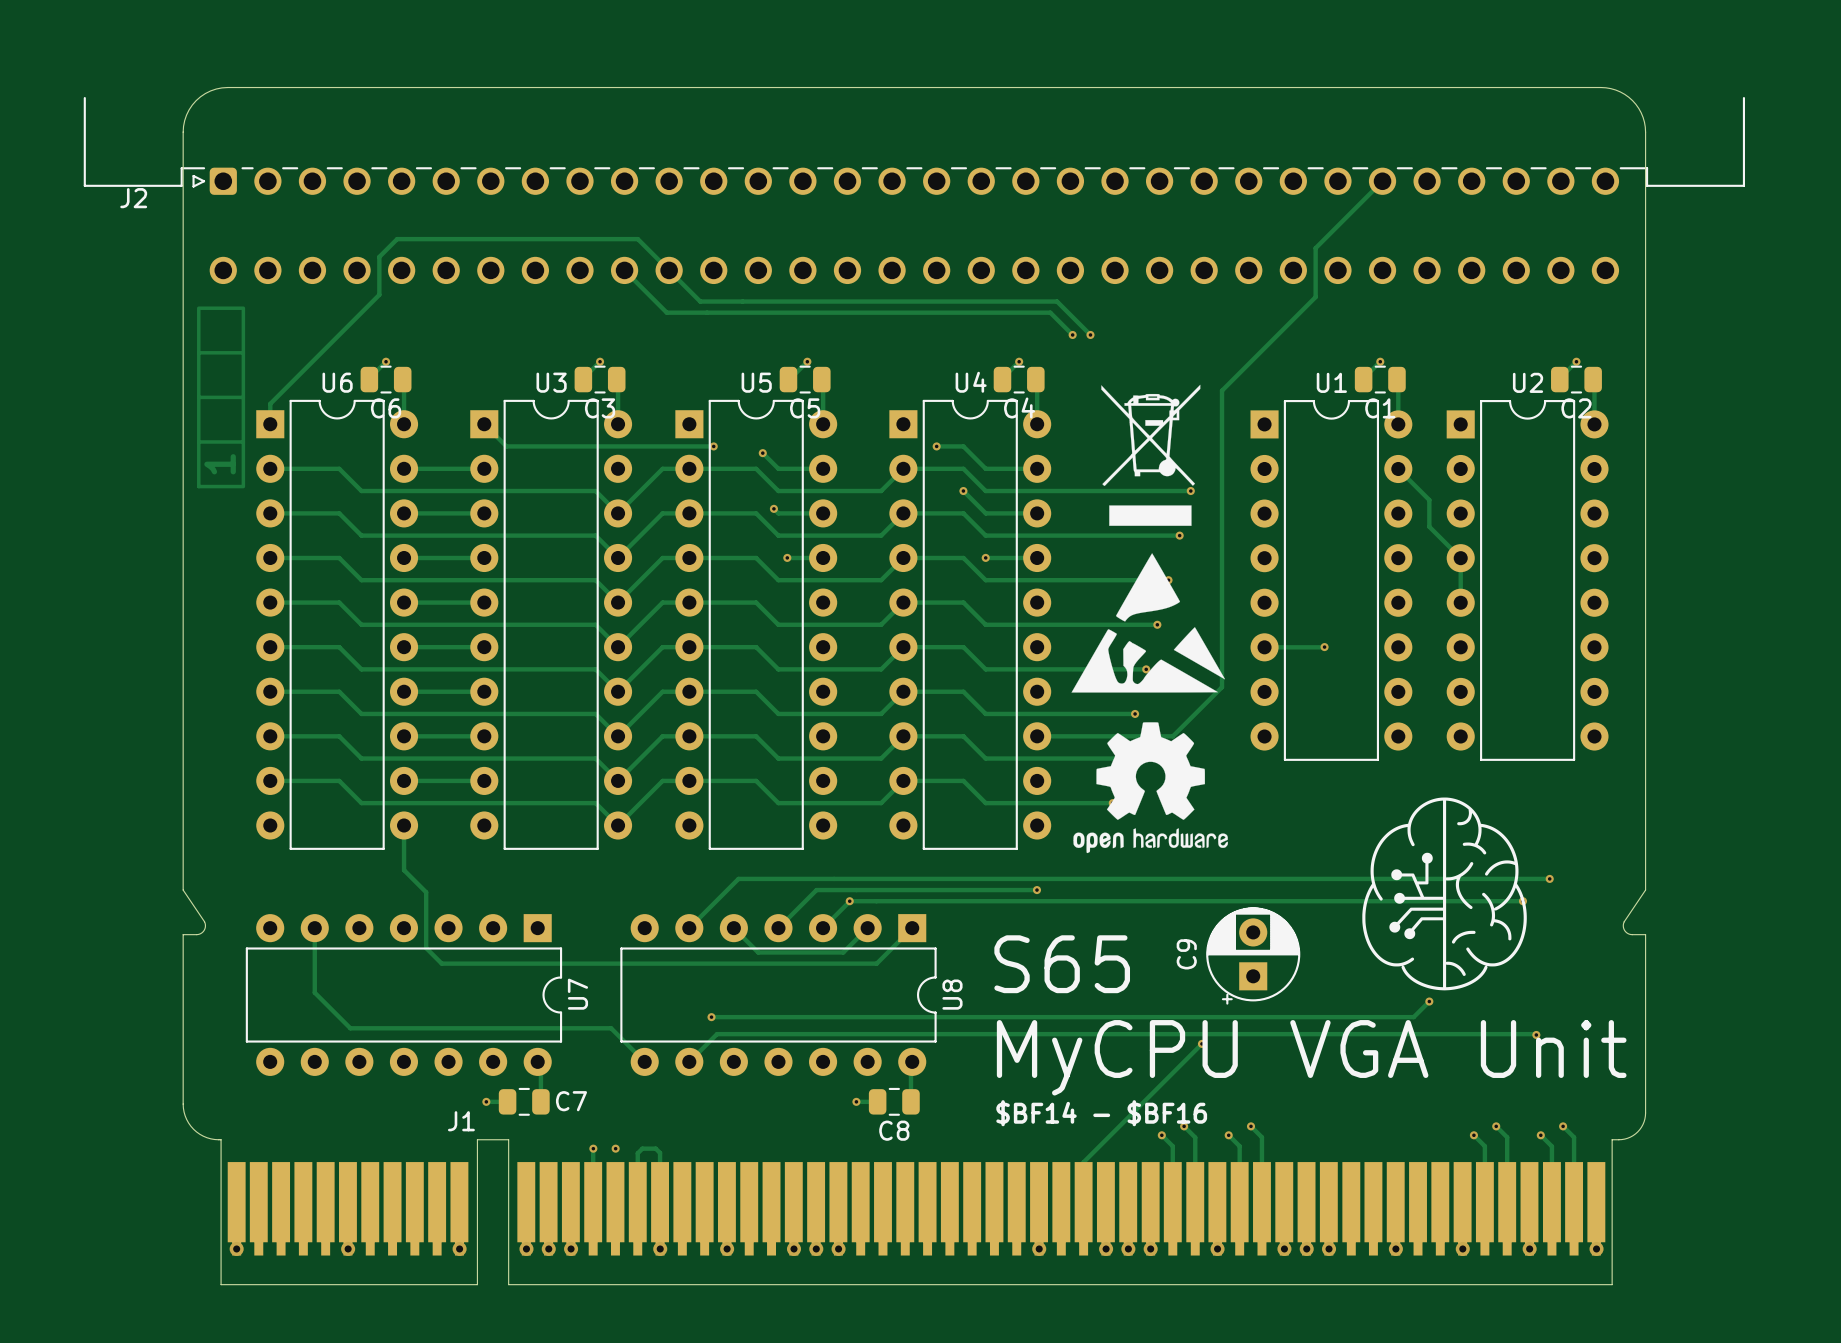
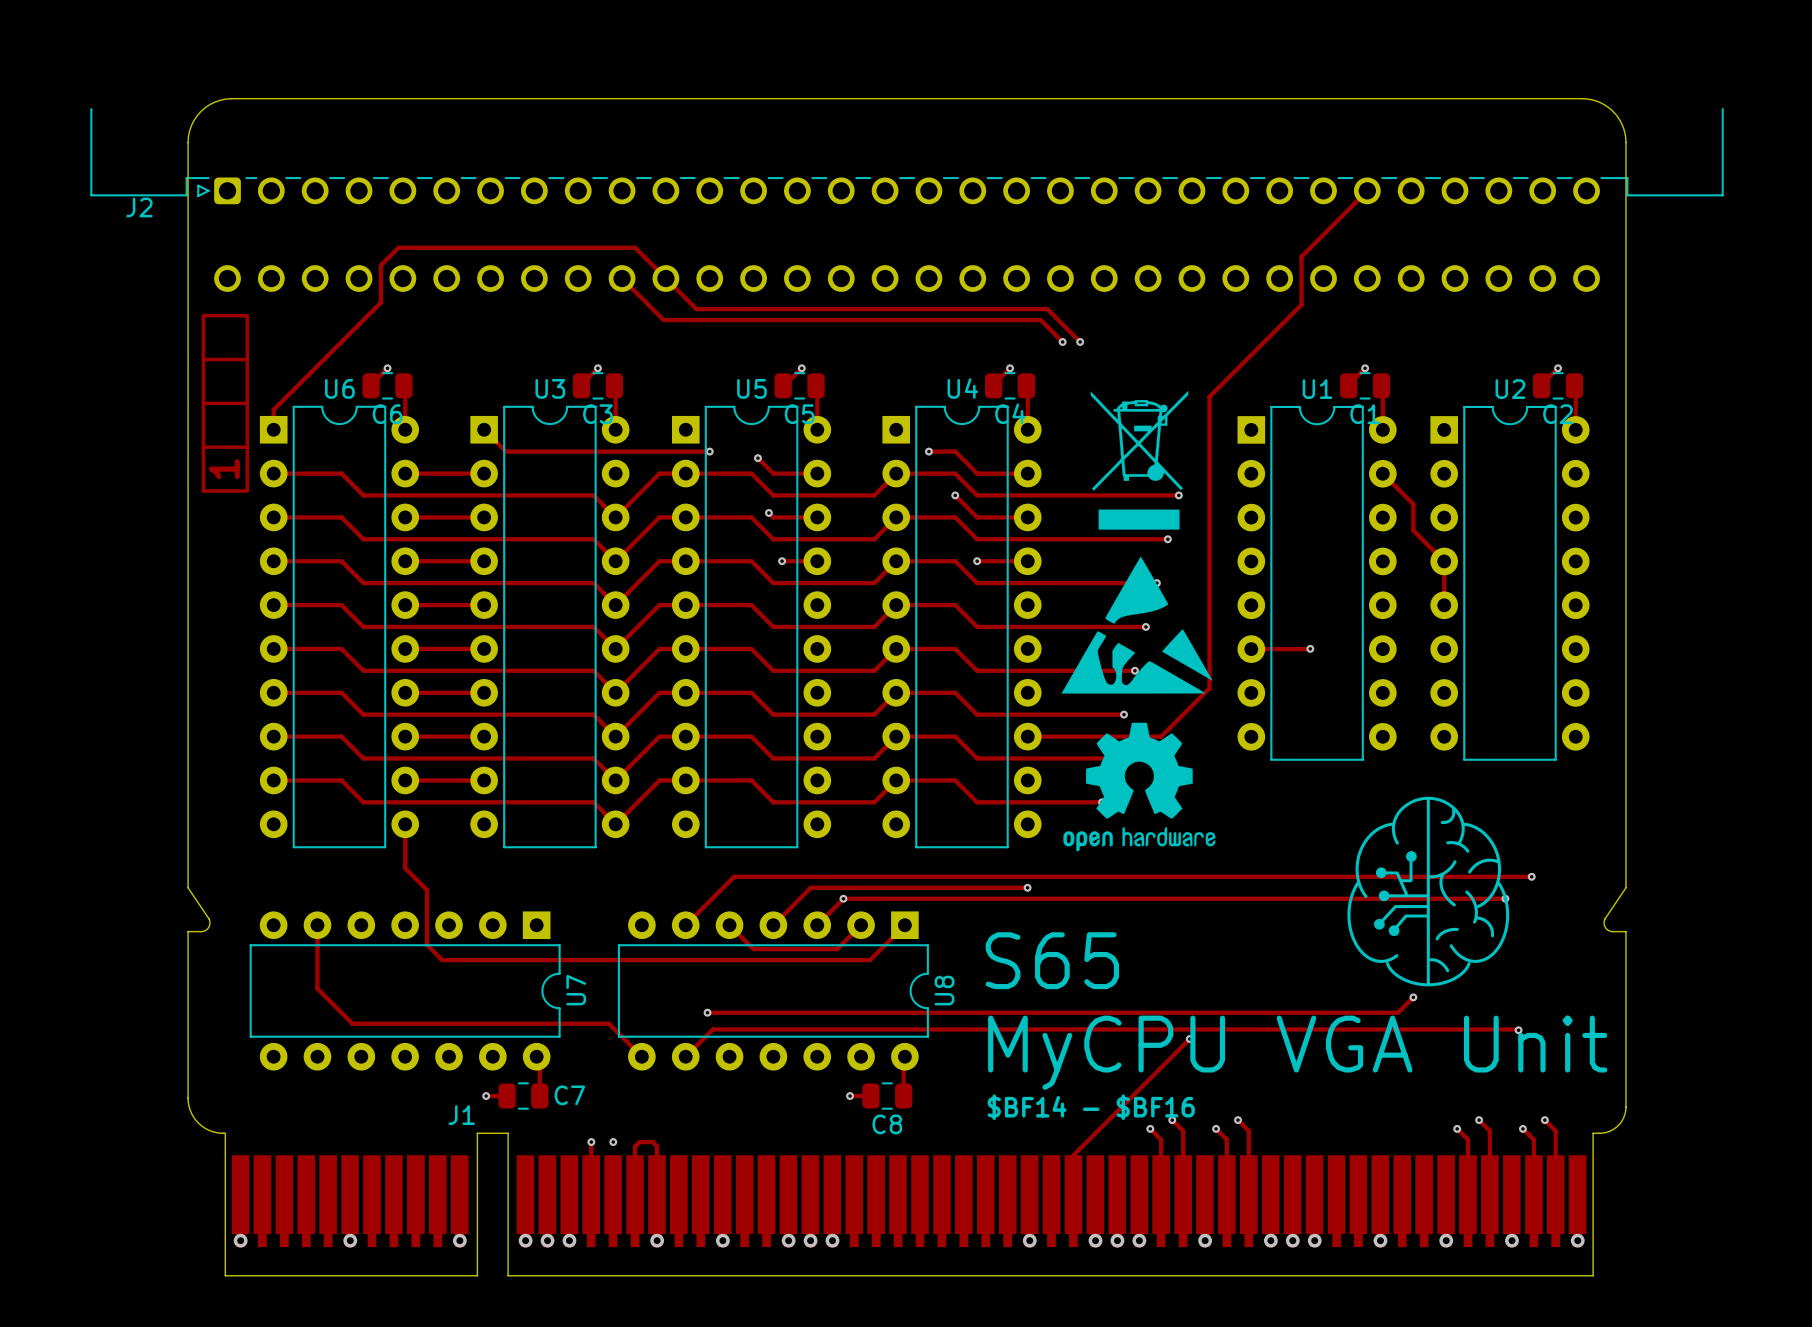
C9: (1253, 955) -> none

